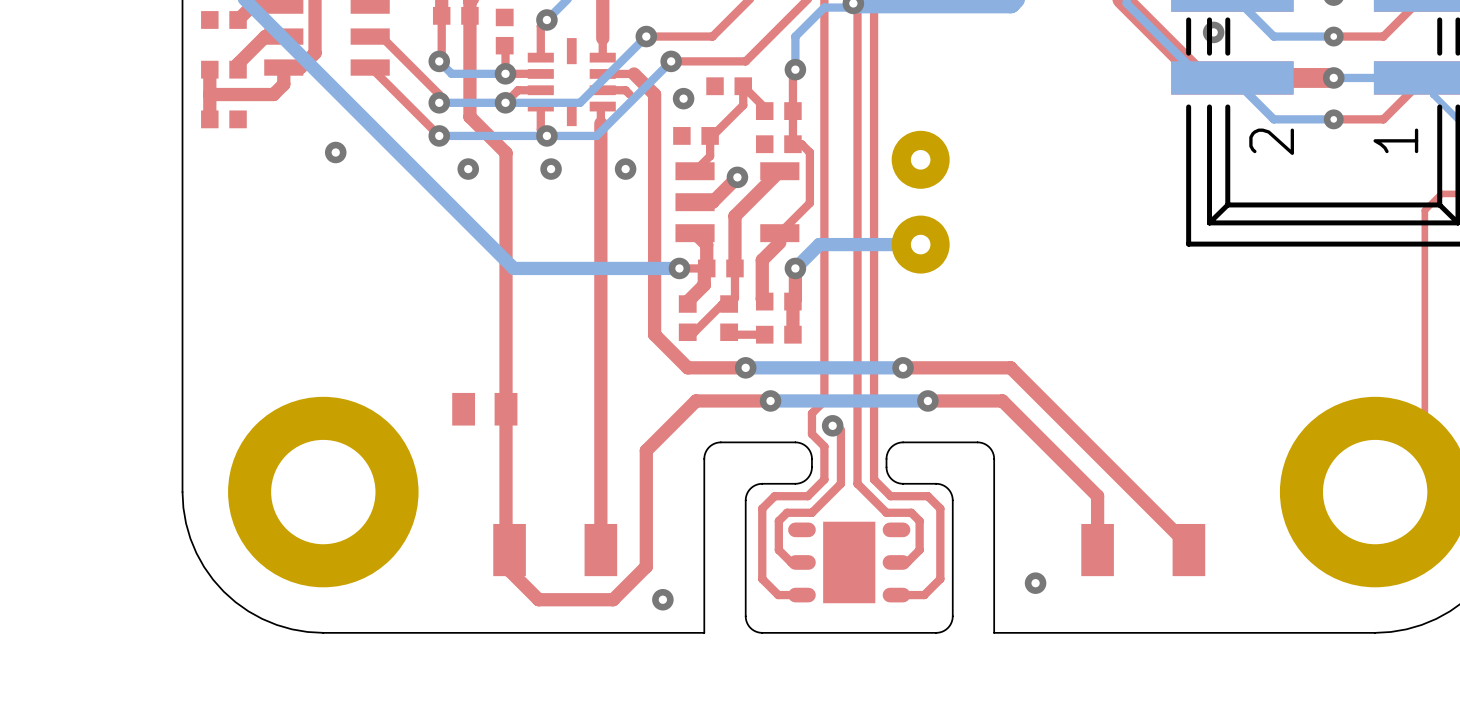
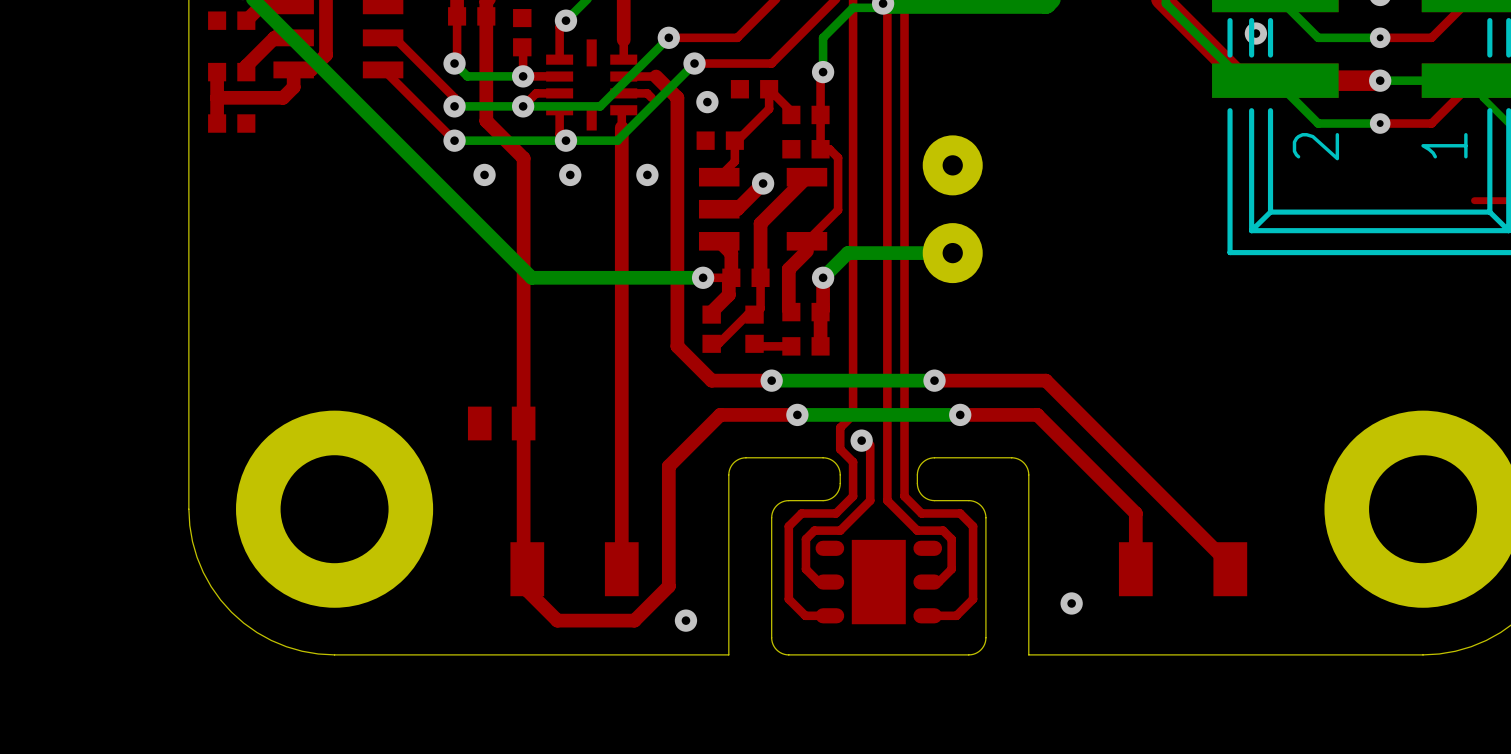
via: (335, 152) -> none
top track: (1441, 193) (1424, 210) (1424, 442) (1375, 492) -> (1491, 200) (1474, 200)

